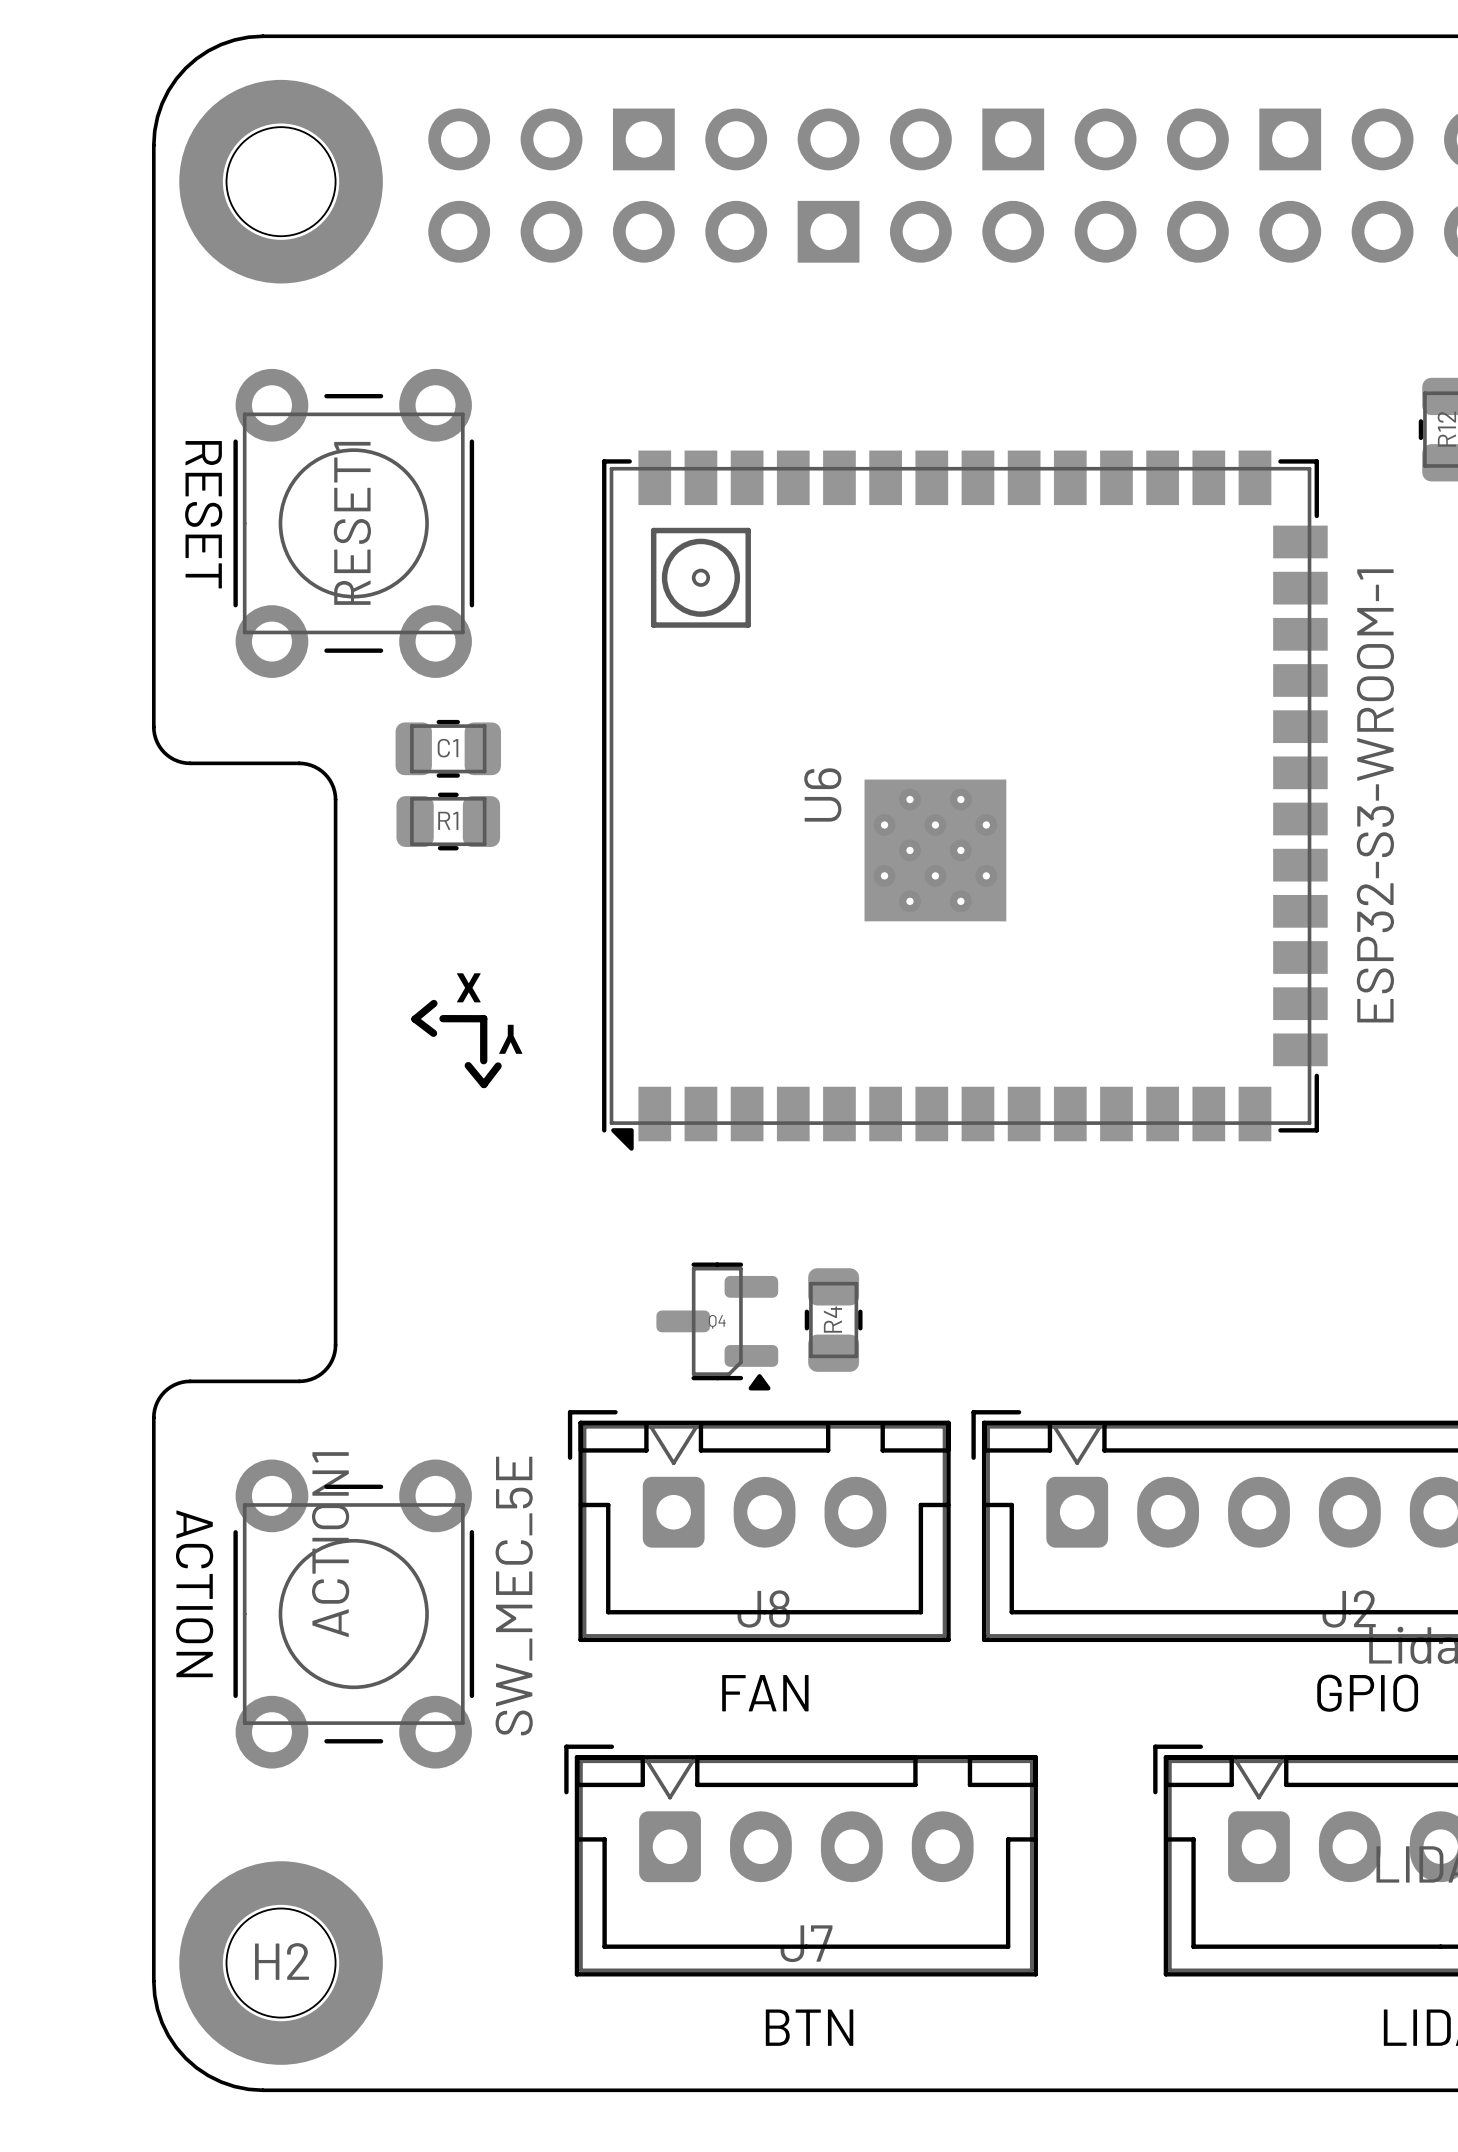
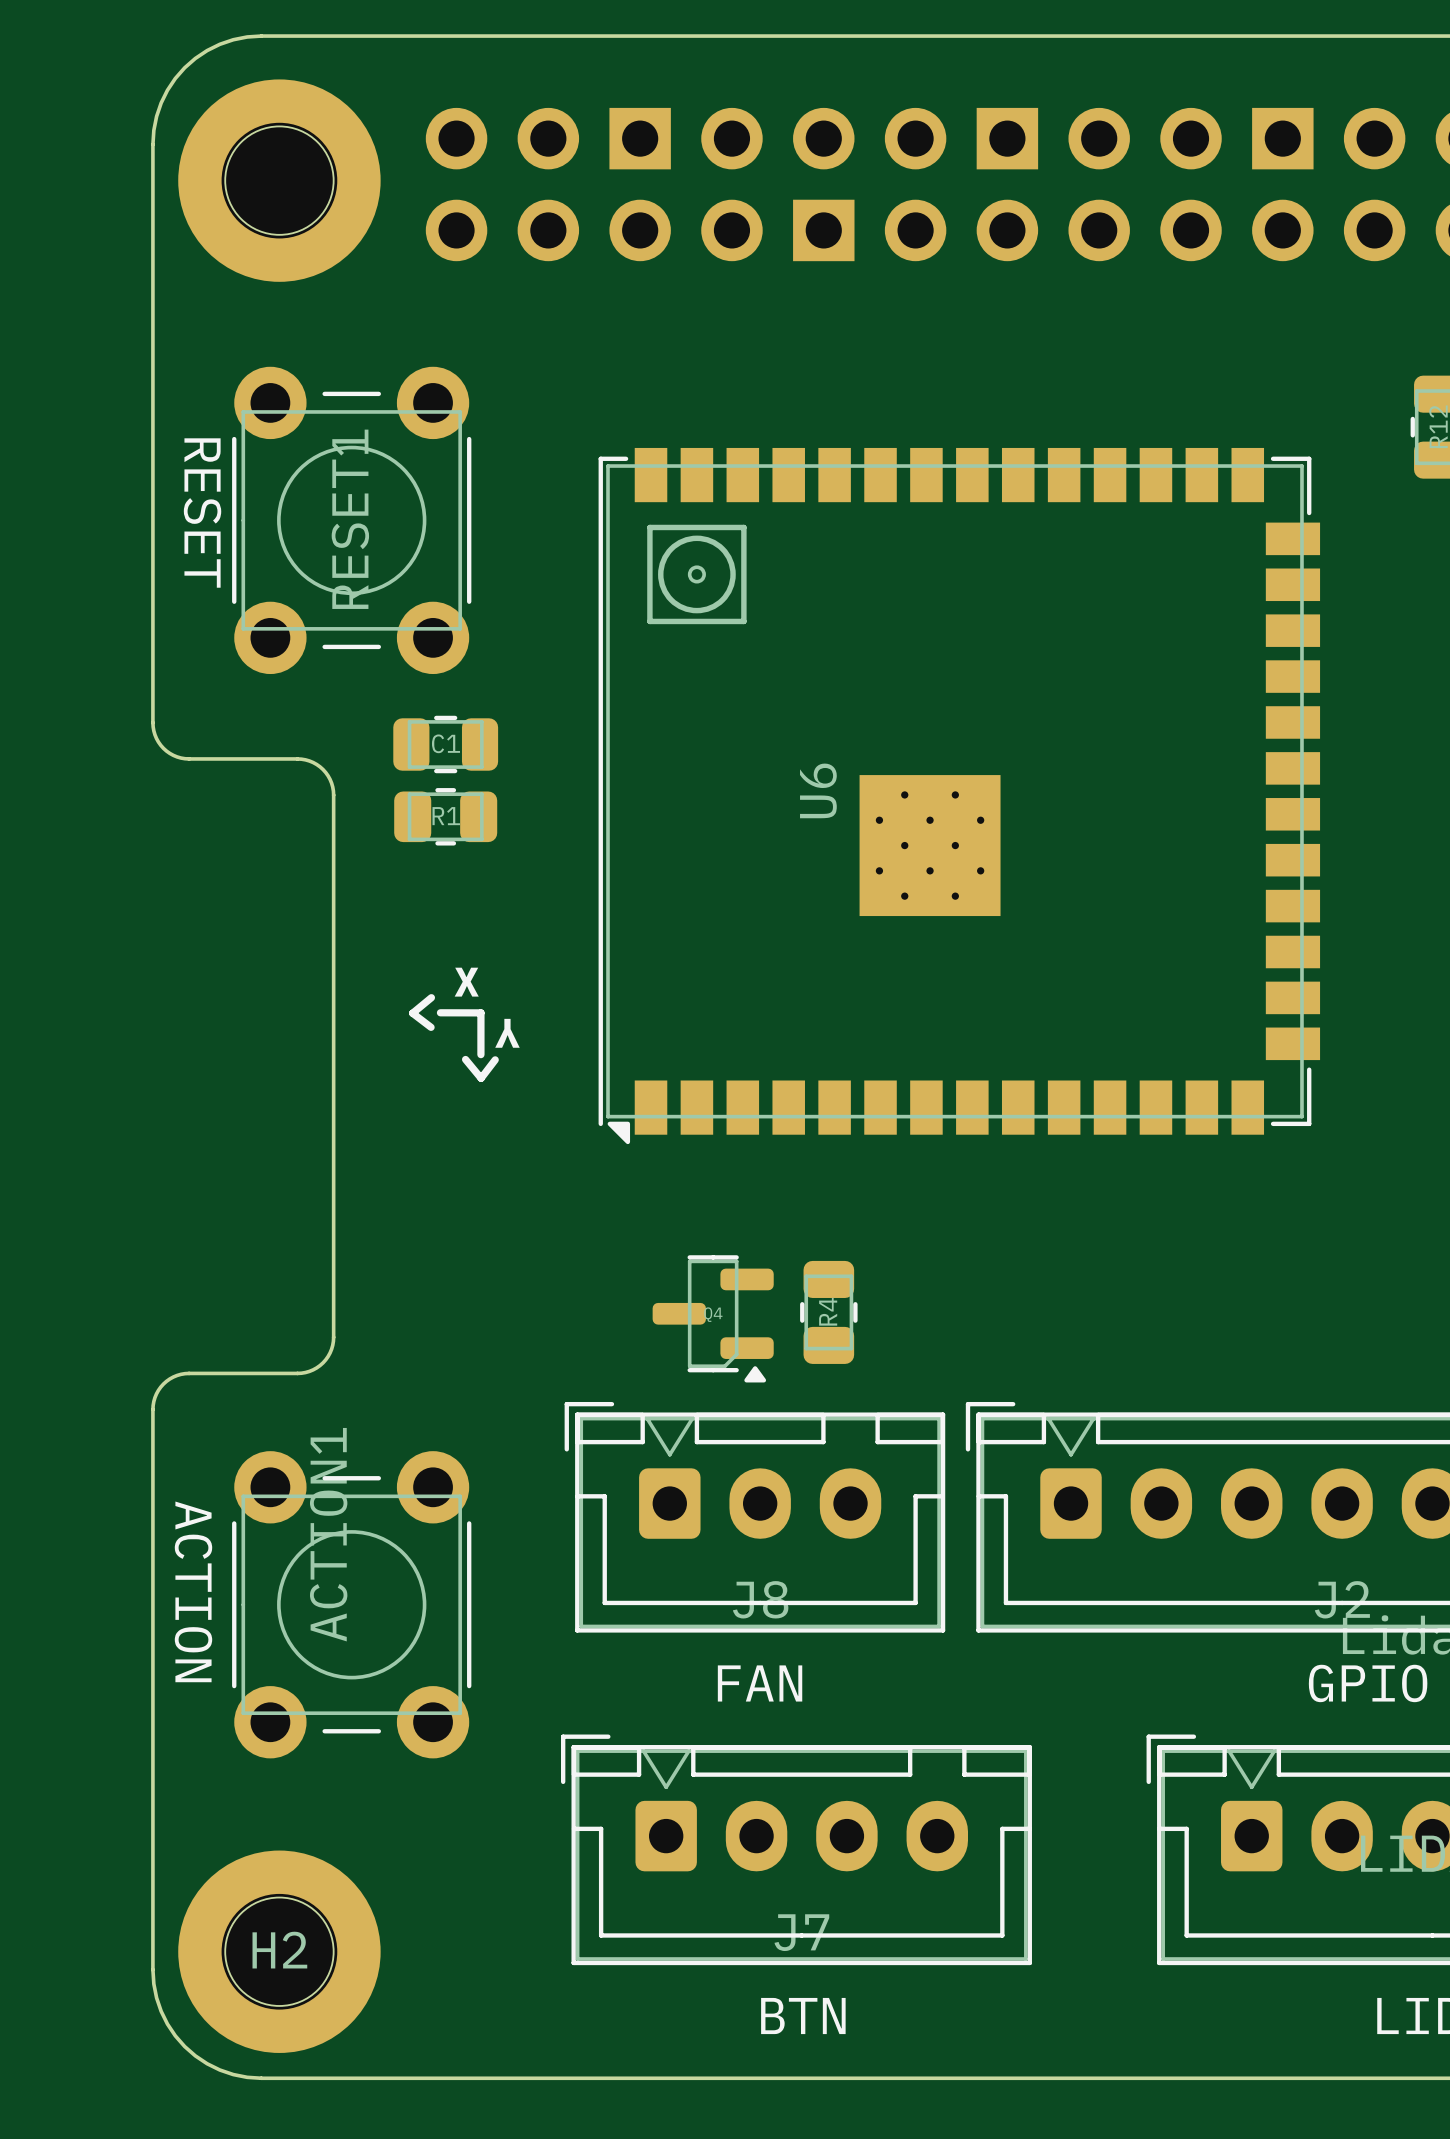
U6 value: ESP32-S3-WROOM-1 (1375, 795) -> none
ACTION1 value: SW_MEC_5E (514, 1596) -> none

